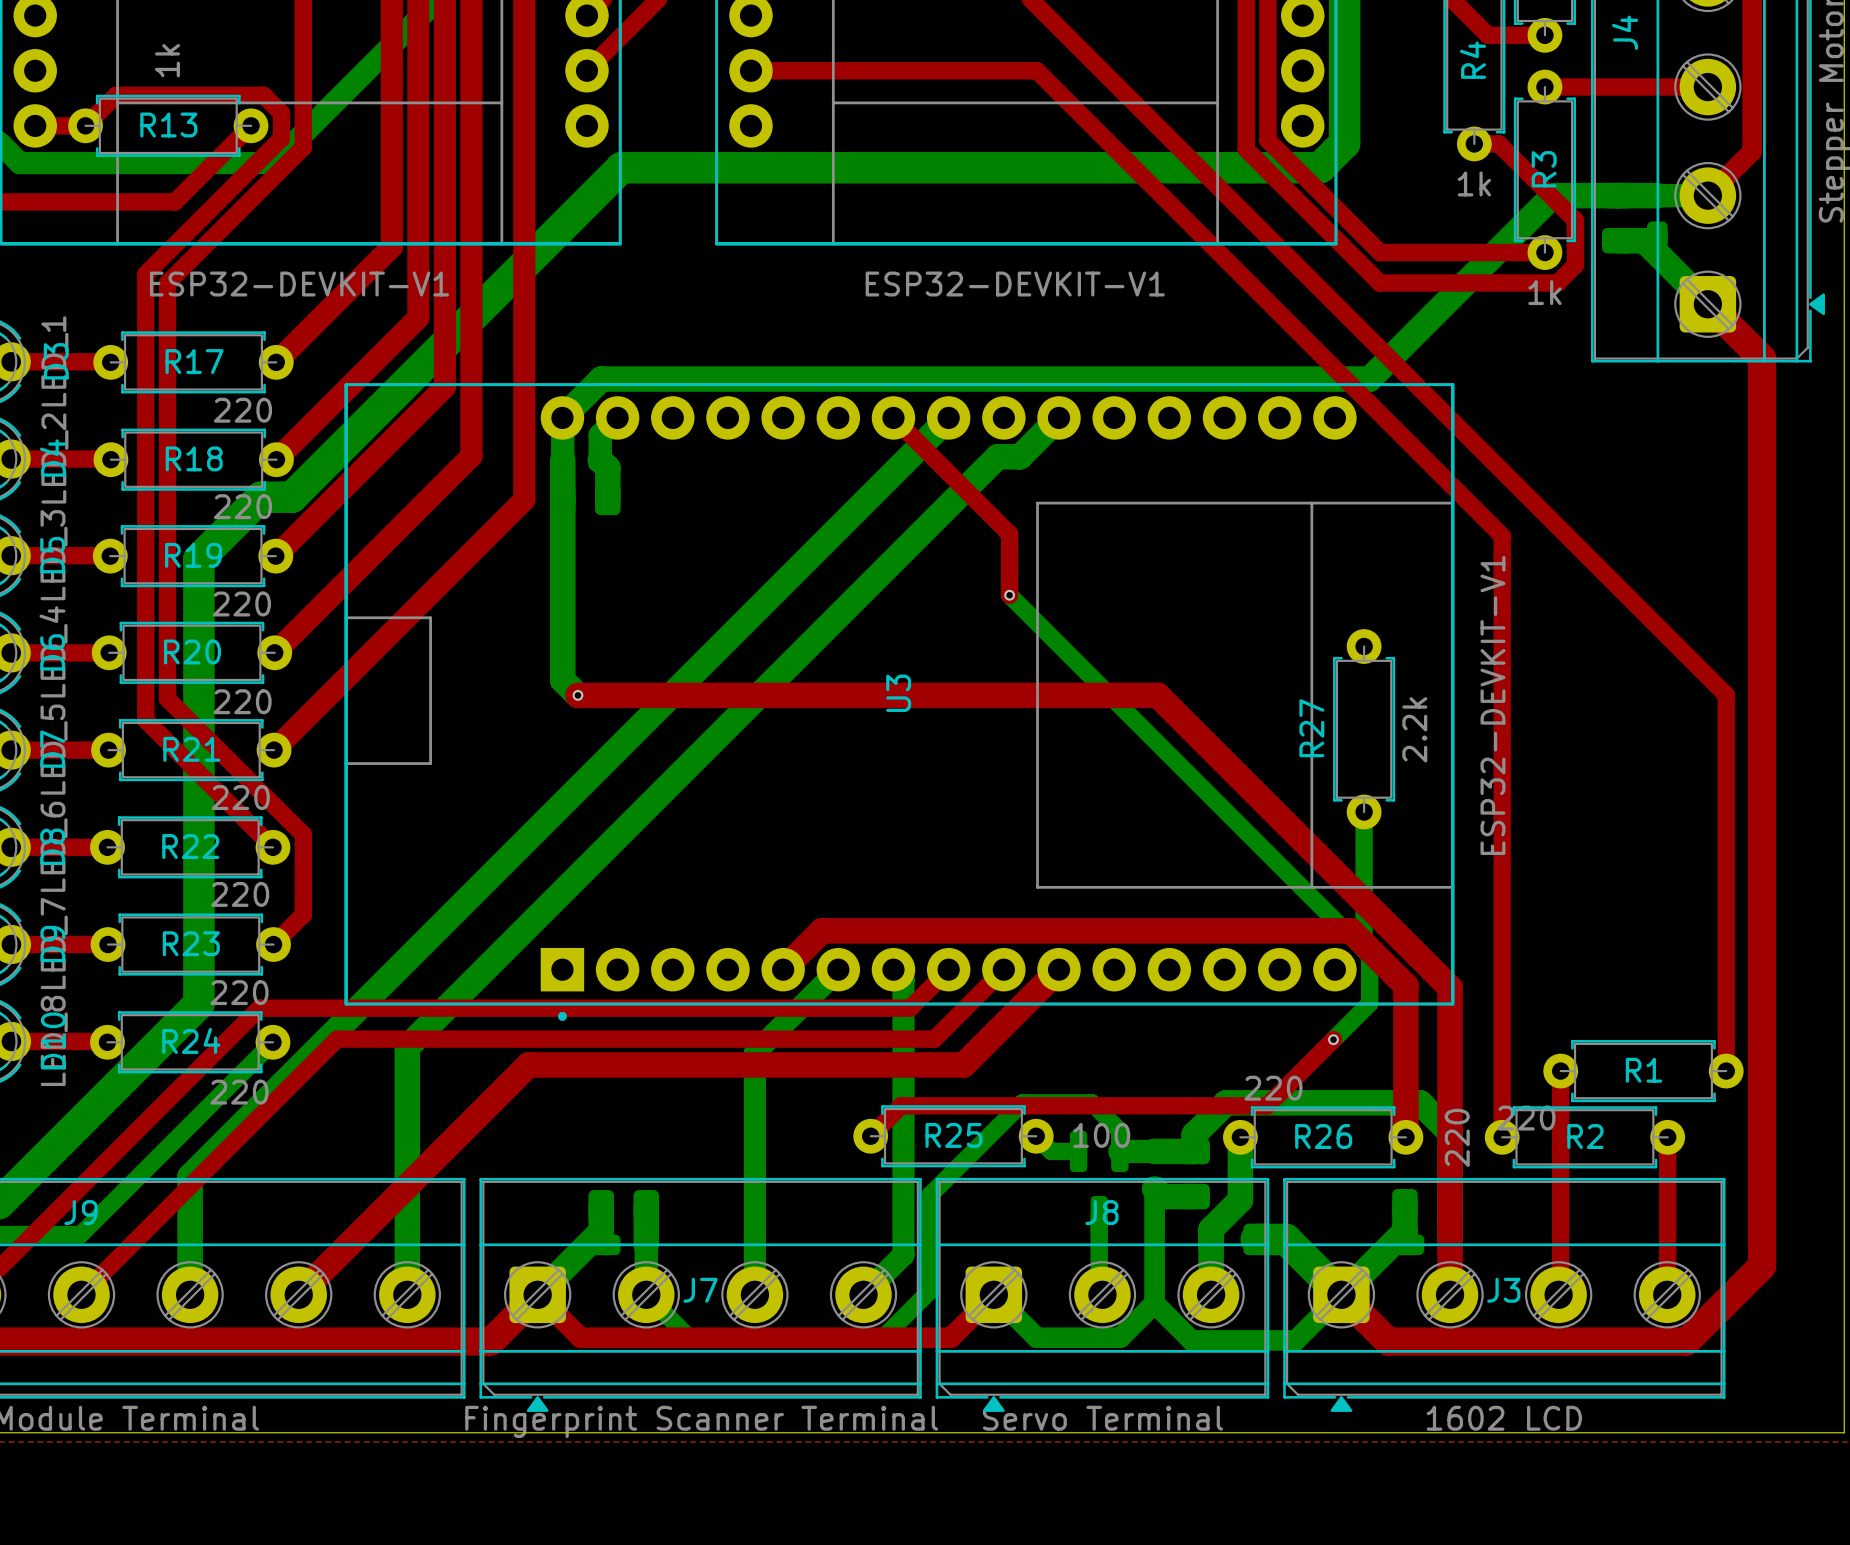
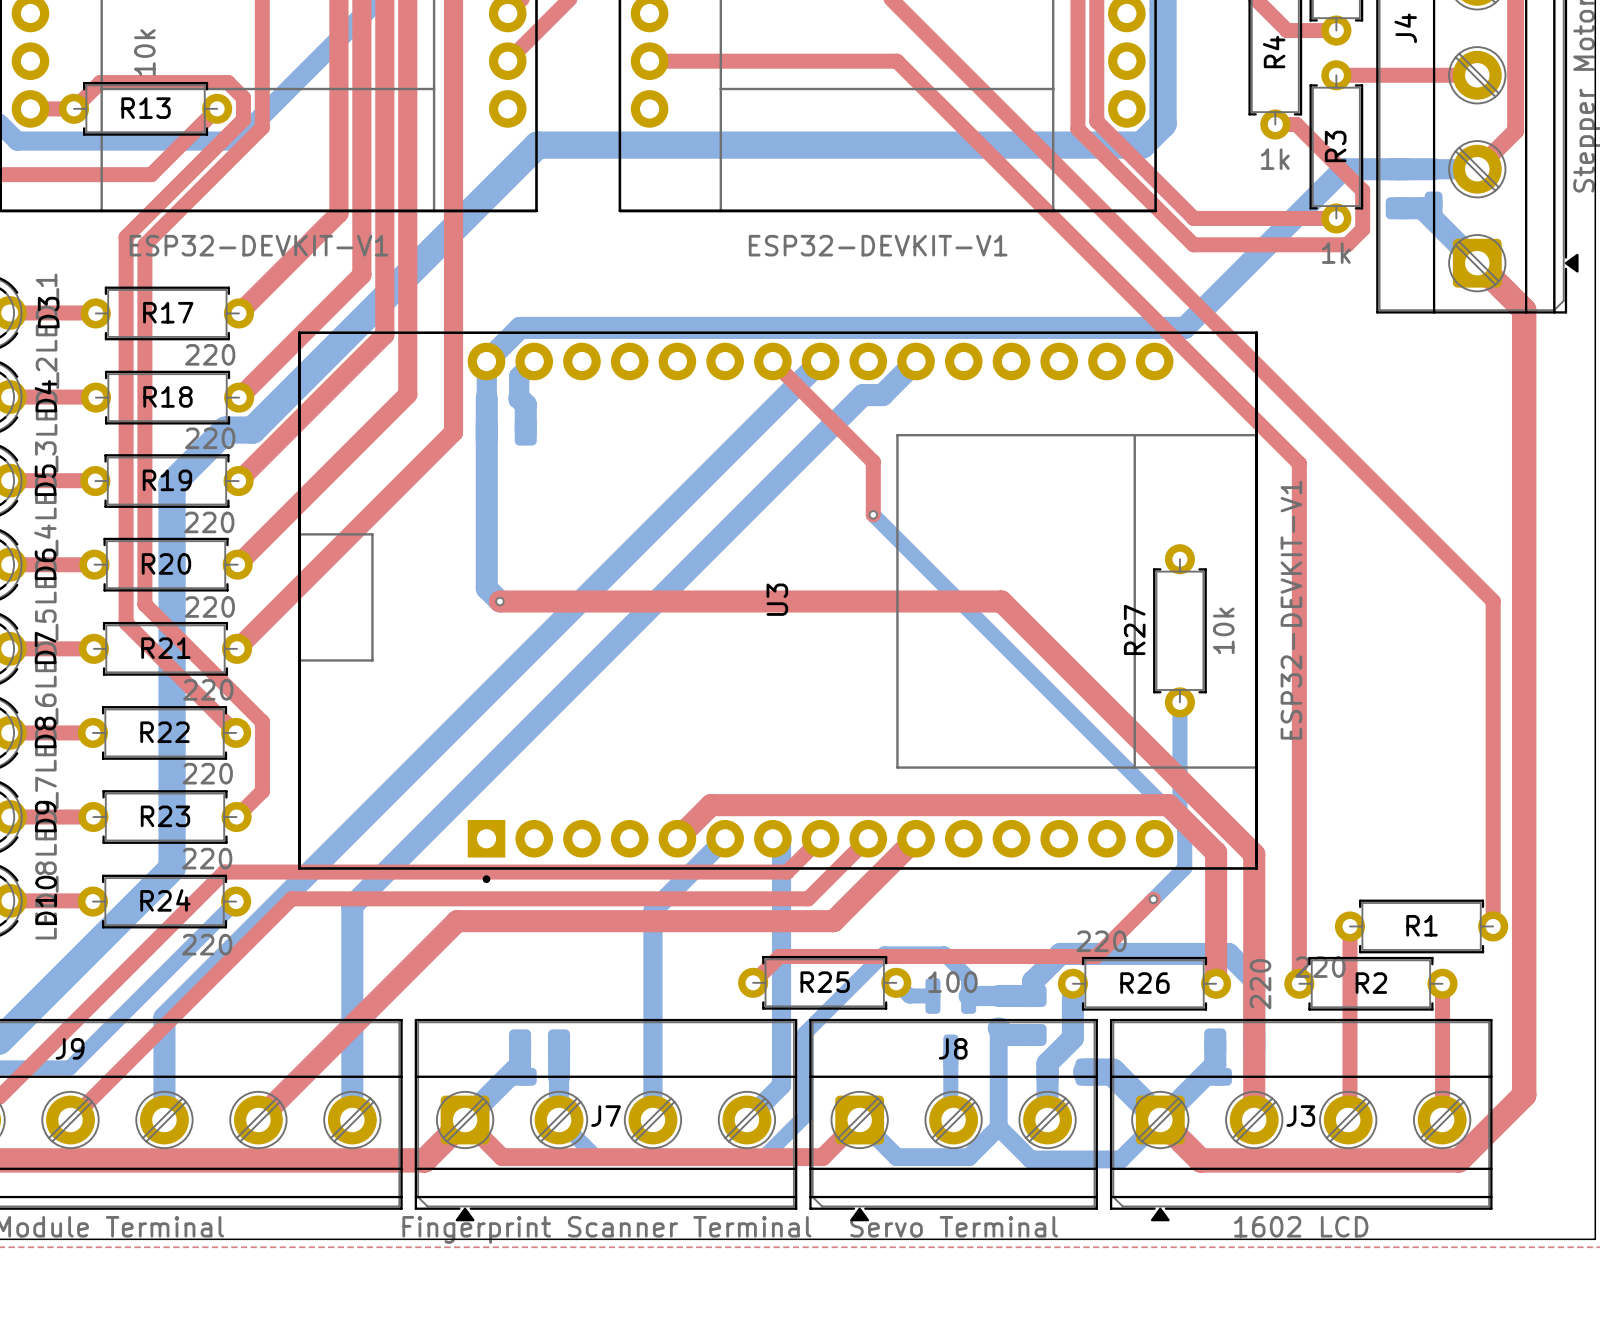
R13 value: 1k (167, 60) -> 10k (144, 52)
R27 value: 2.2k (1414, 729) -> 10k (1223, 630)

